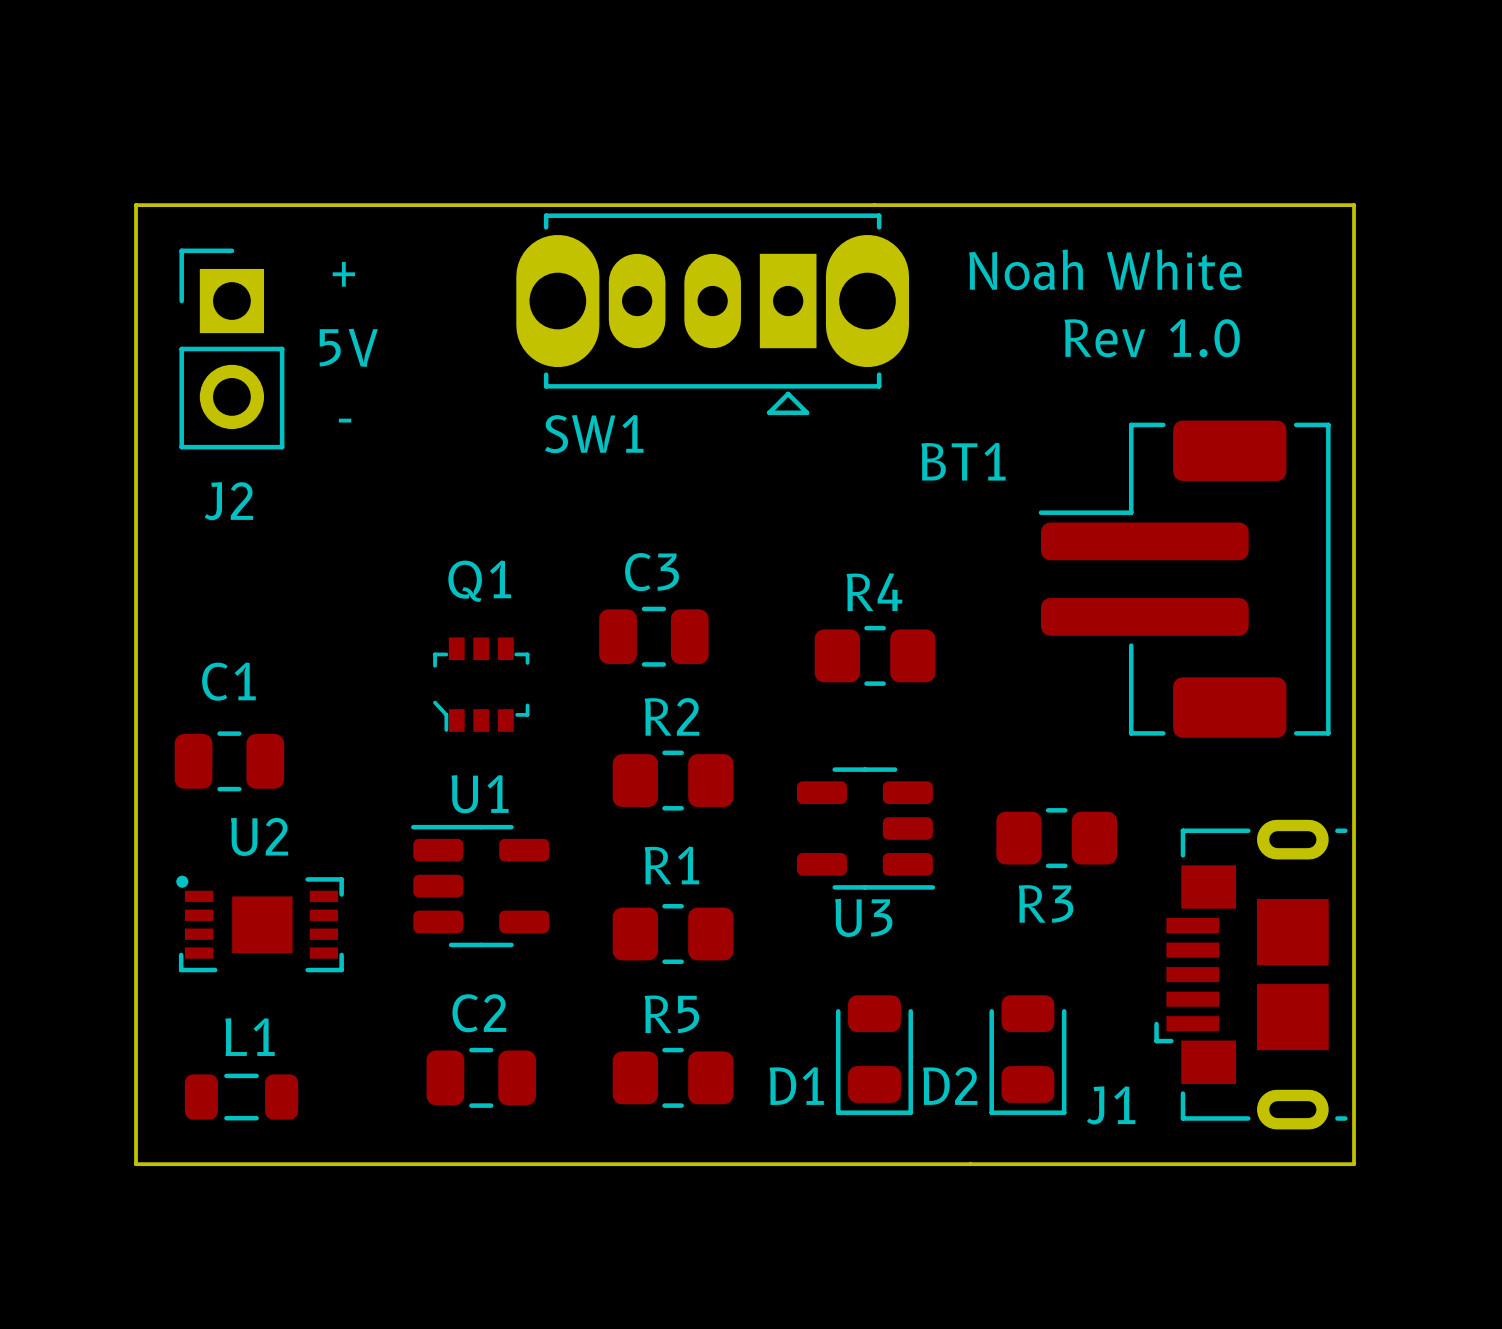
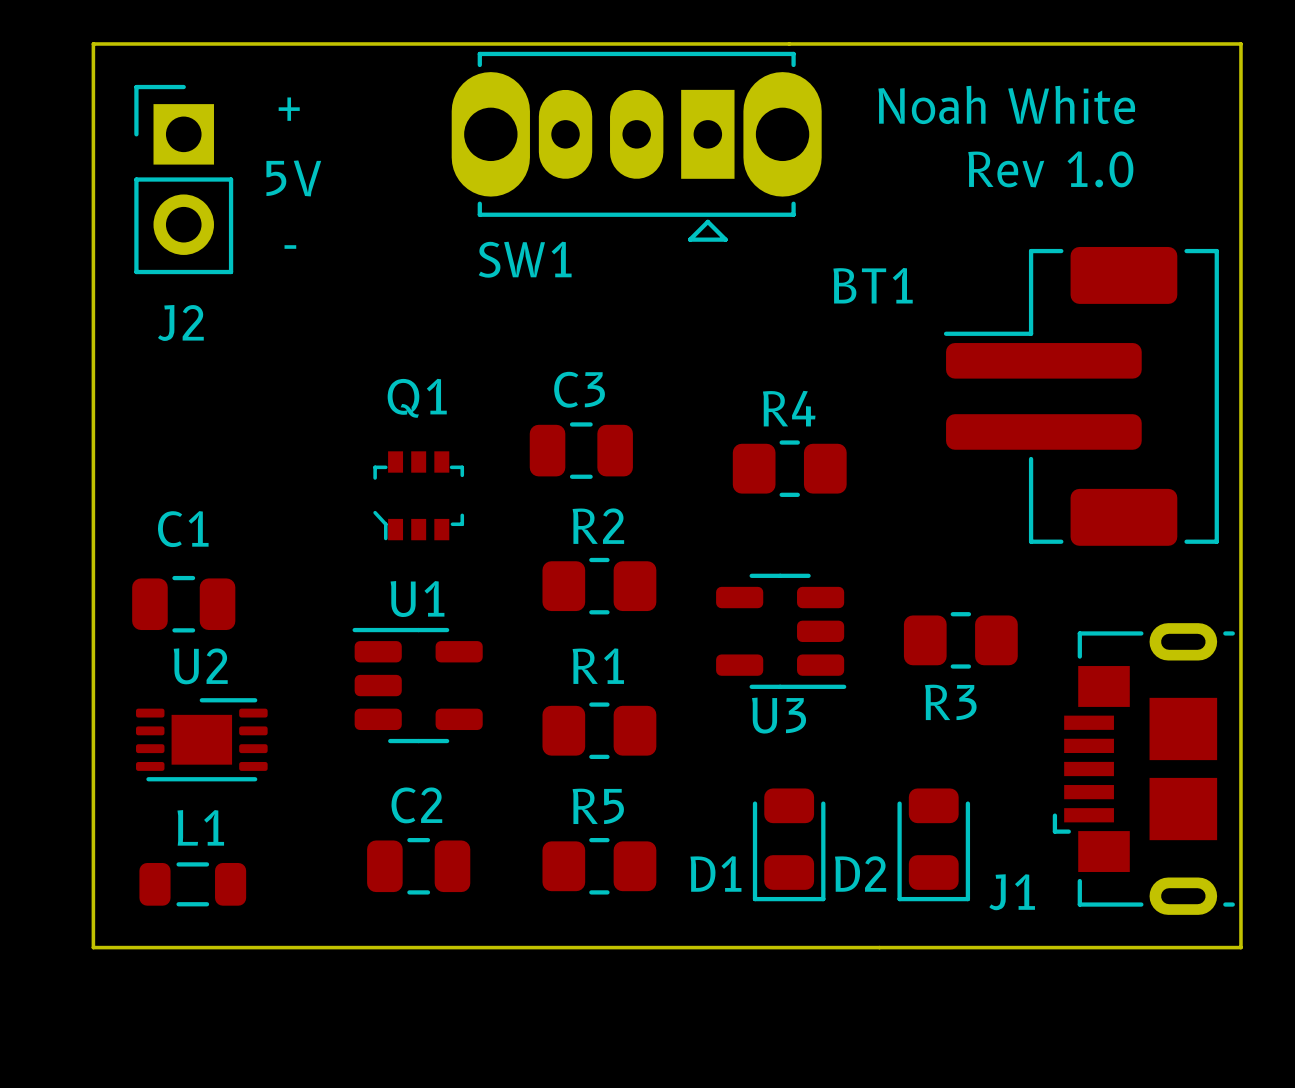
C1 position: (229, 761) -> (183, 604)
U2 footprint: [176, 875, 344, 973] -> [136, 698, 268, 782]

